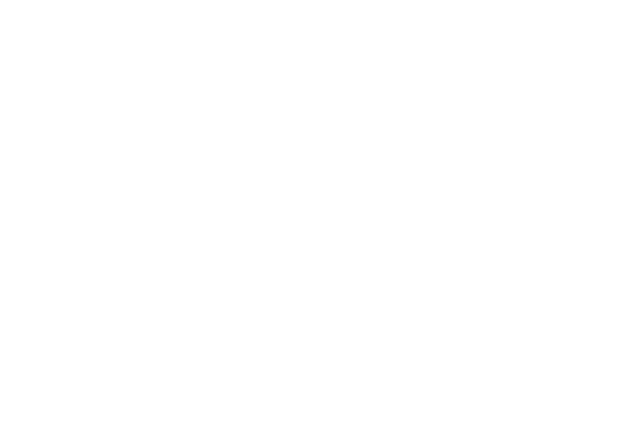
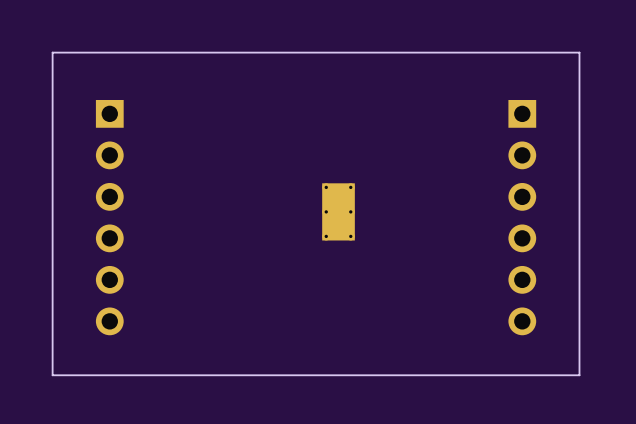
board edge: none -> (579, 52) (52, 52) (52, 375) (579, 375) (579, 52)
part: none -> (338, 211)
part: none -> (109, 217)
part: none -> (522, 217)

